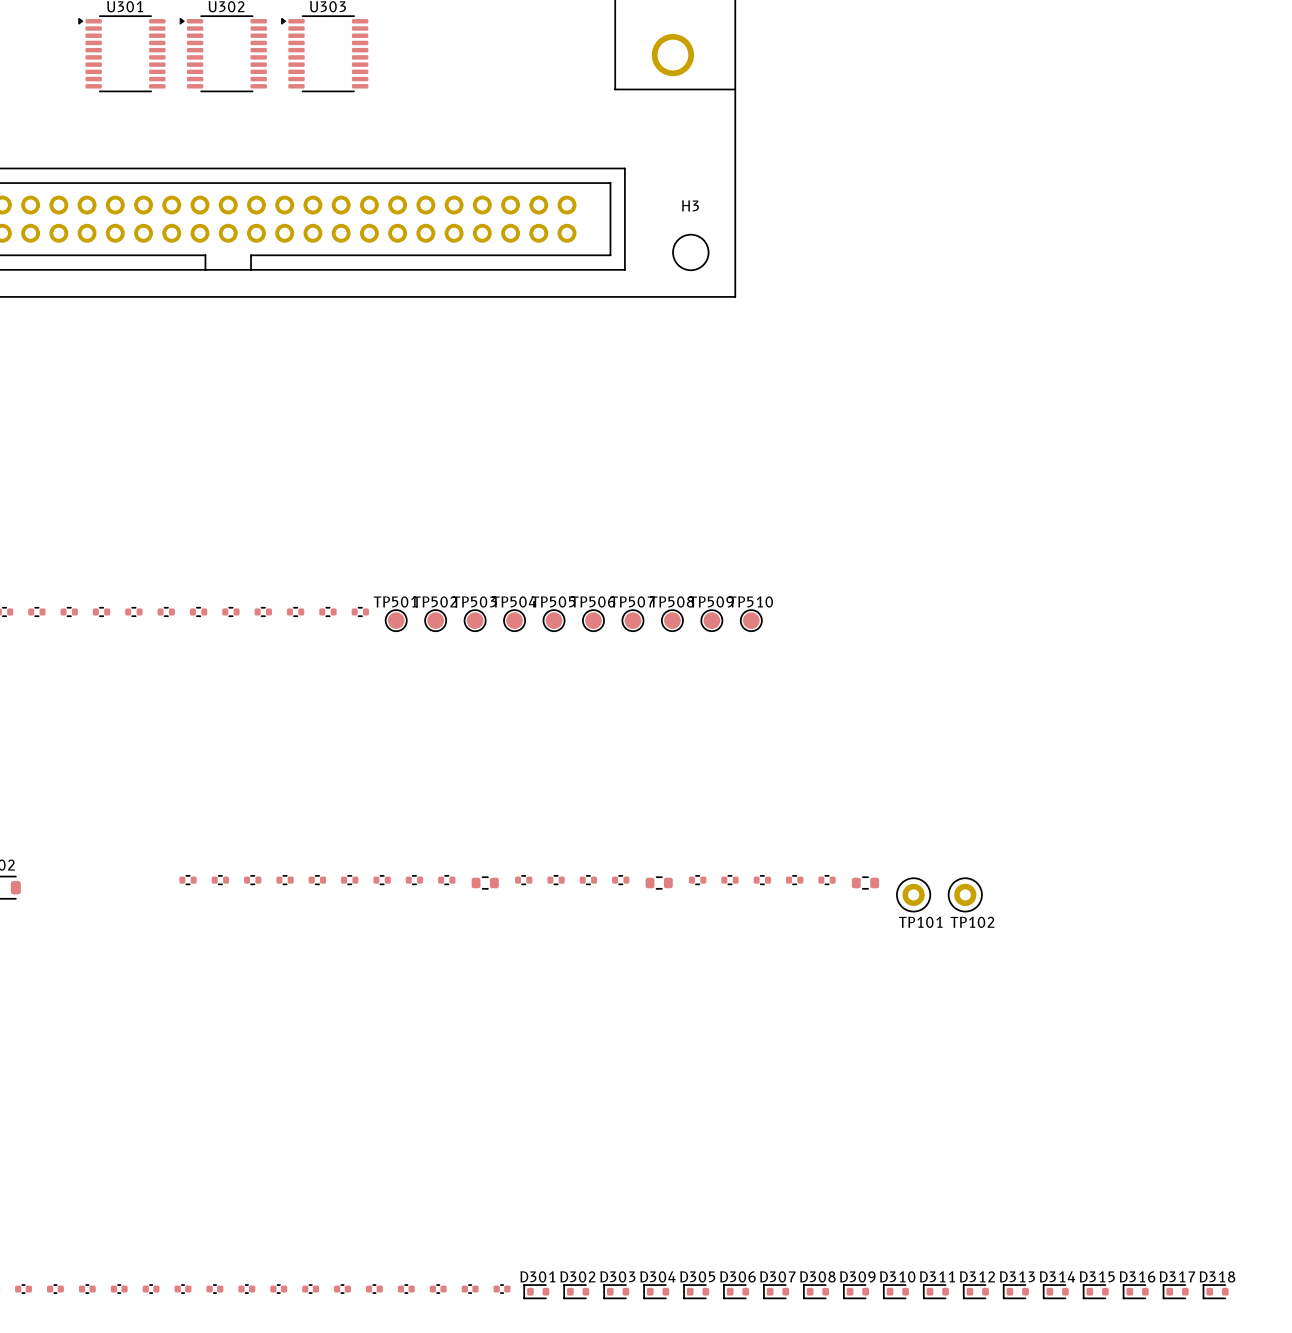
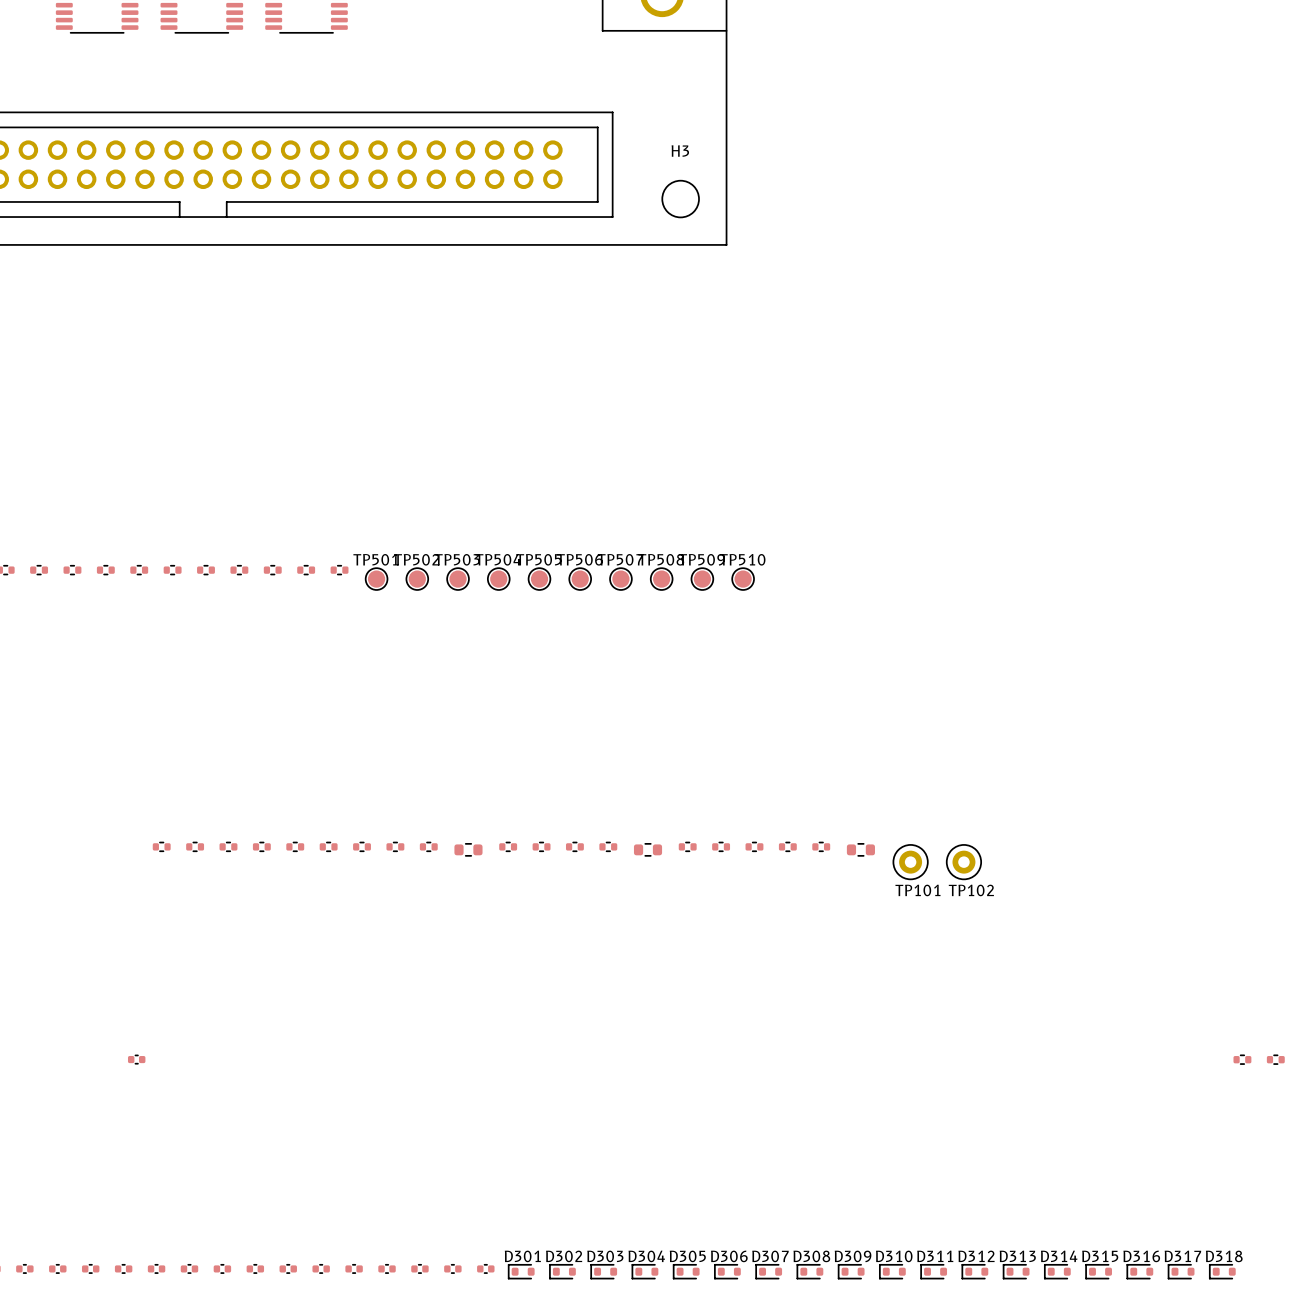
part: none -> (136, 1059)
part: none -> (1242, 1059)
part: none -> (1275, 1059)

